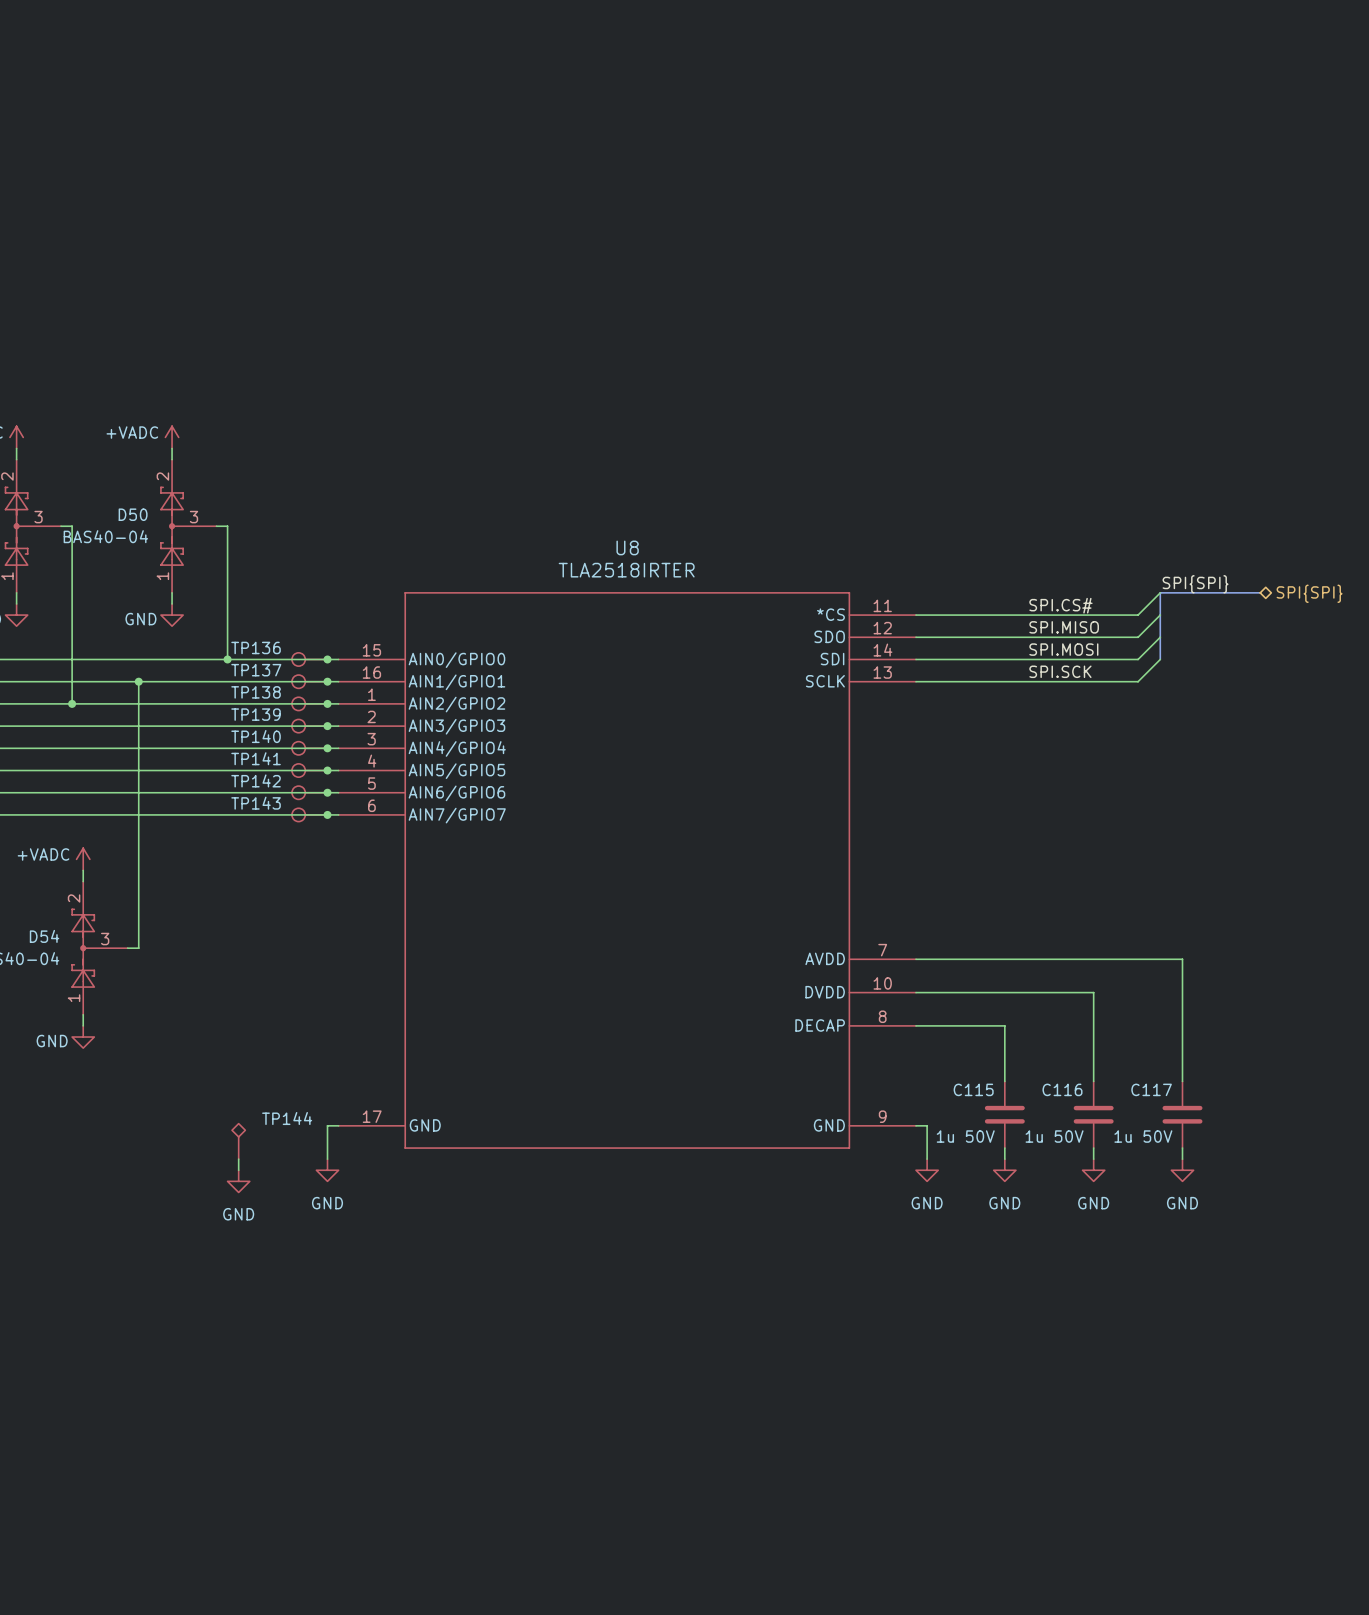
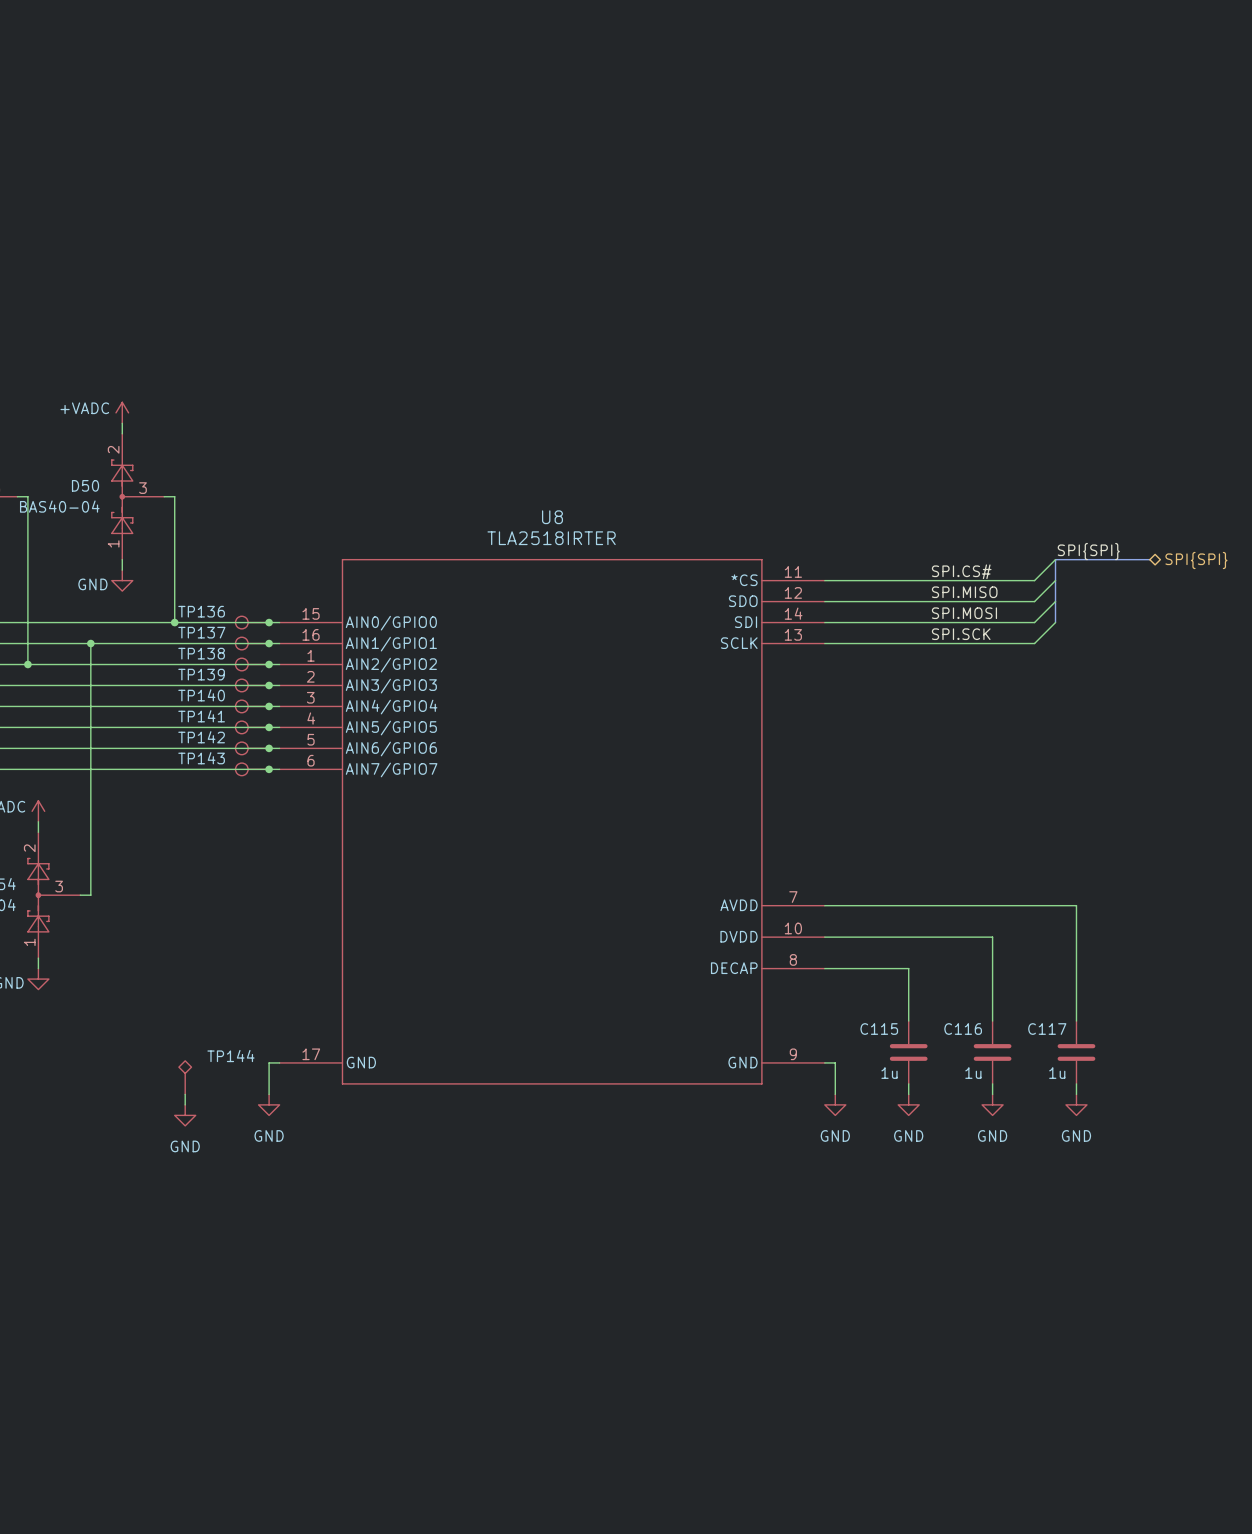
C115 value: 1u 50V (965, 1136) -> 1u (889, 1073)
C116 value: 1u 50V (1054, 1136) -> 1u (973, 1073)
C117 value: 1u 50V (1143, 1136) -> 1u (1057, 1073)

